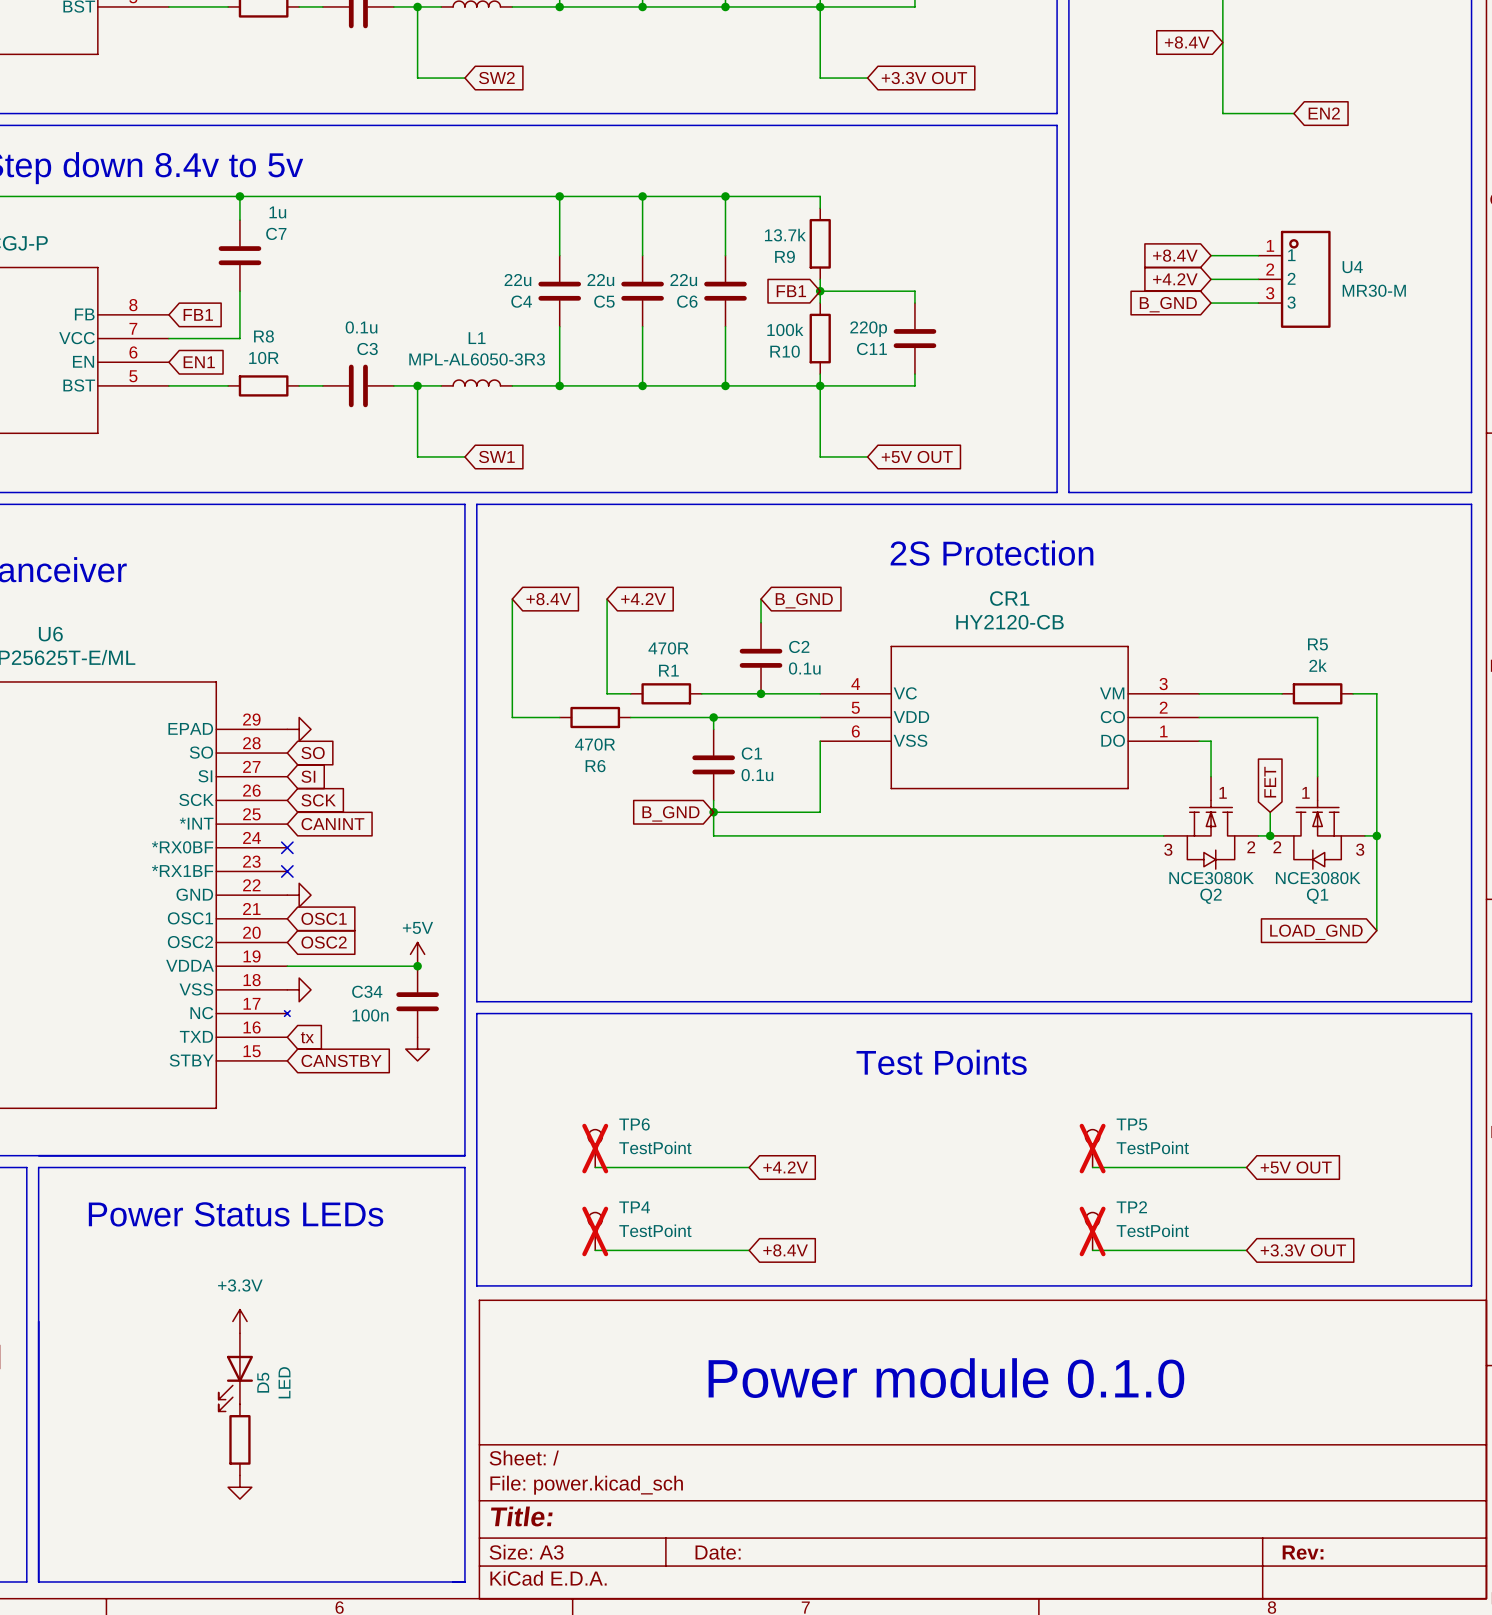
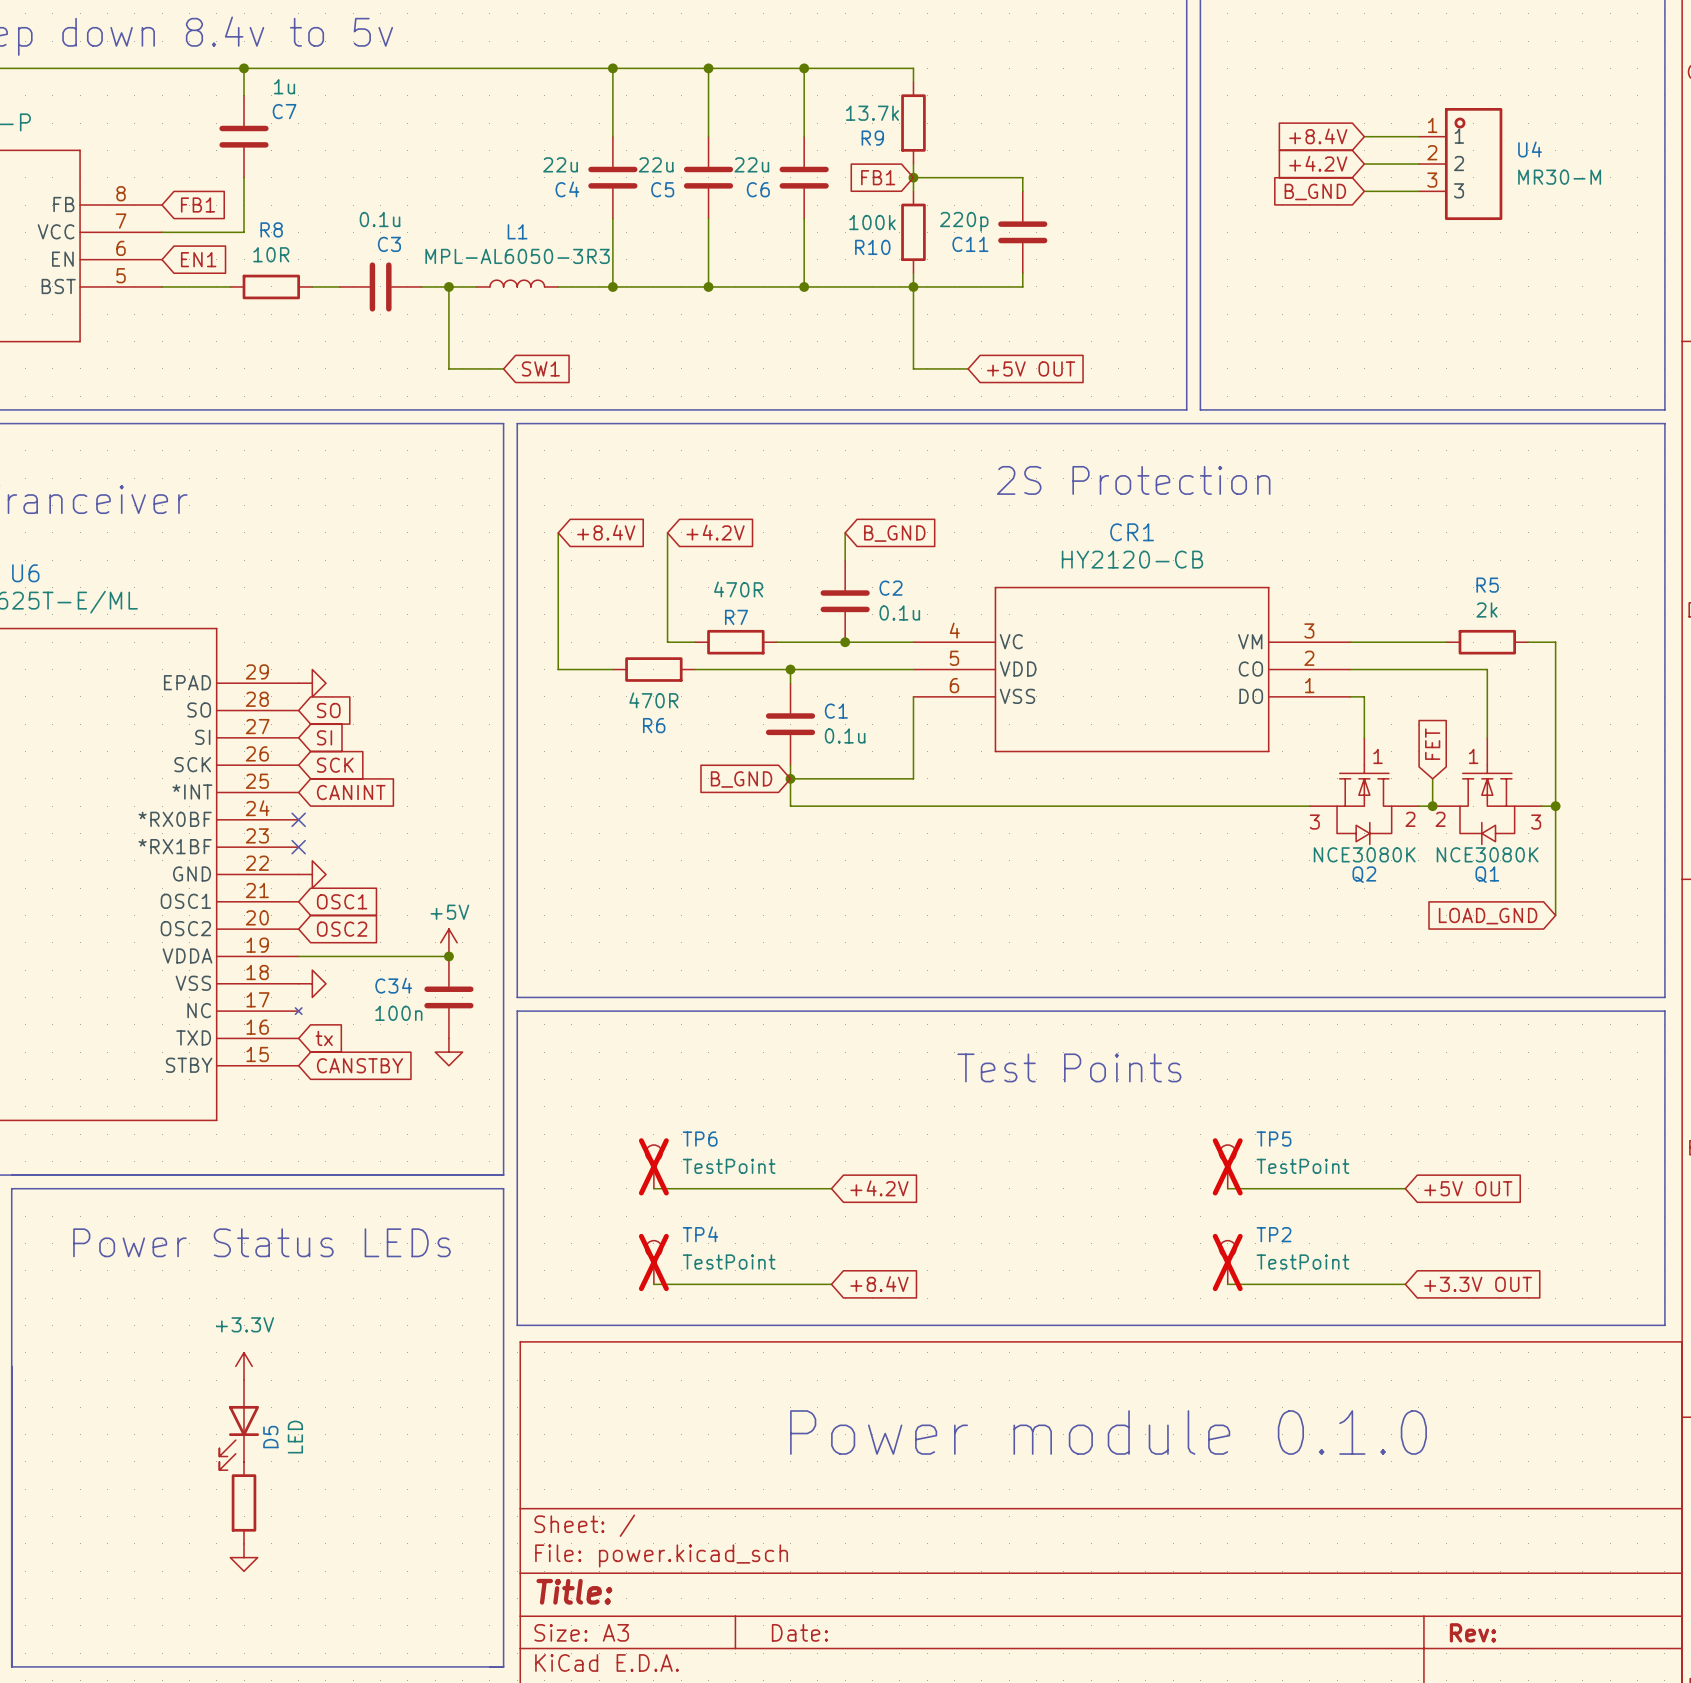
R1 name: R1 (668, 670) -> R7 (736, 617)

